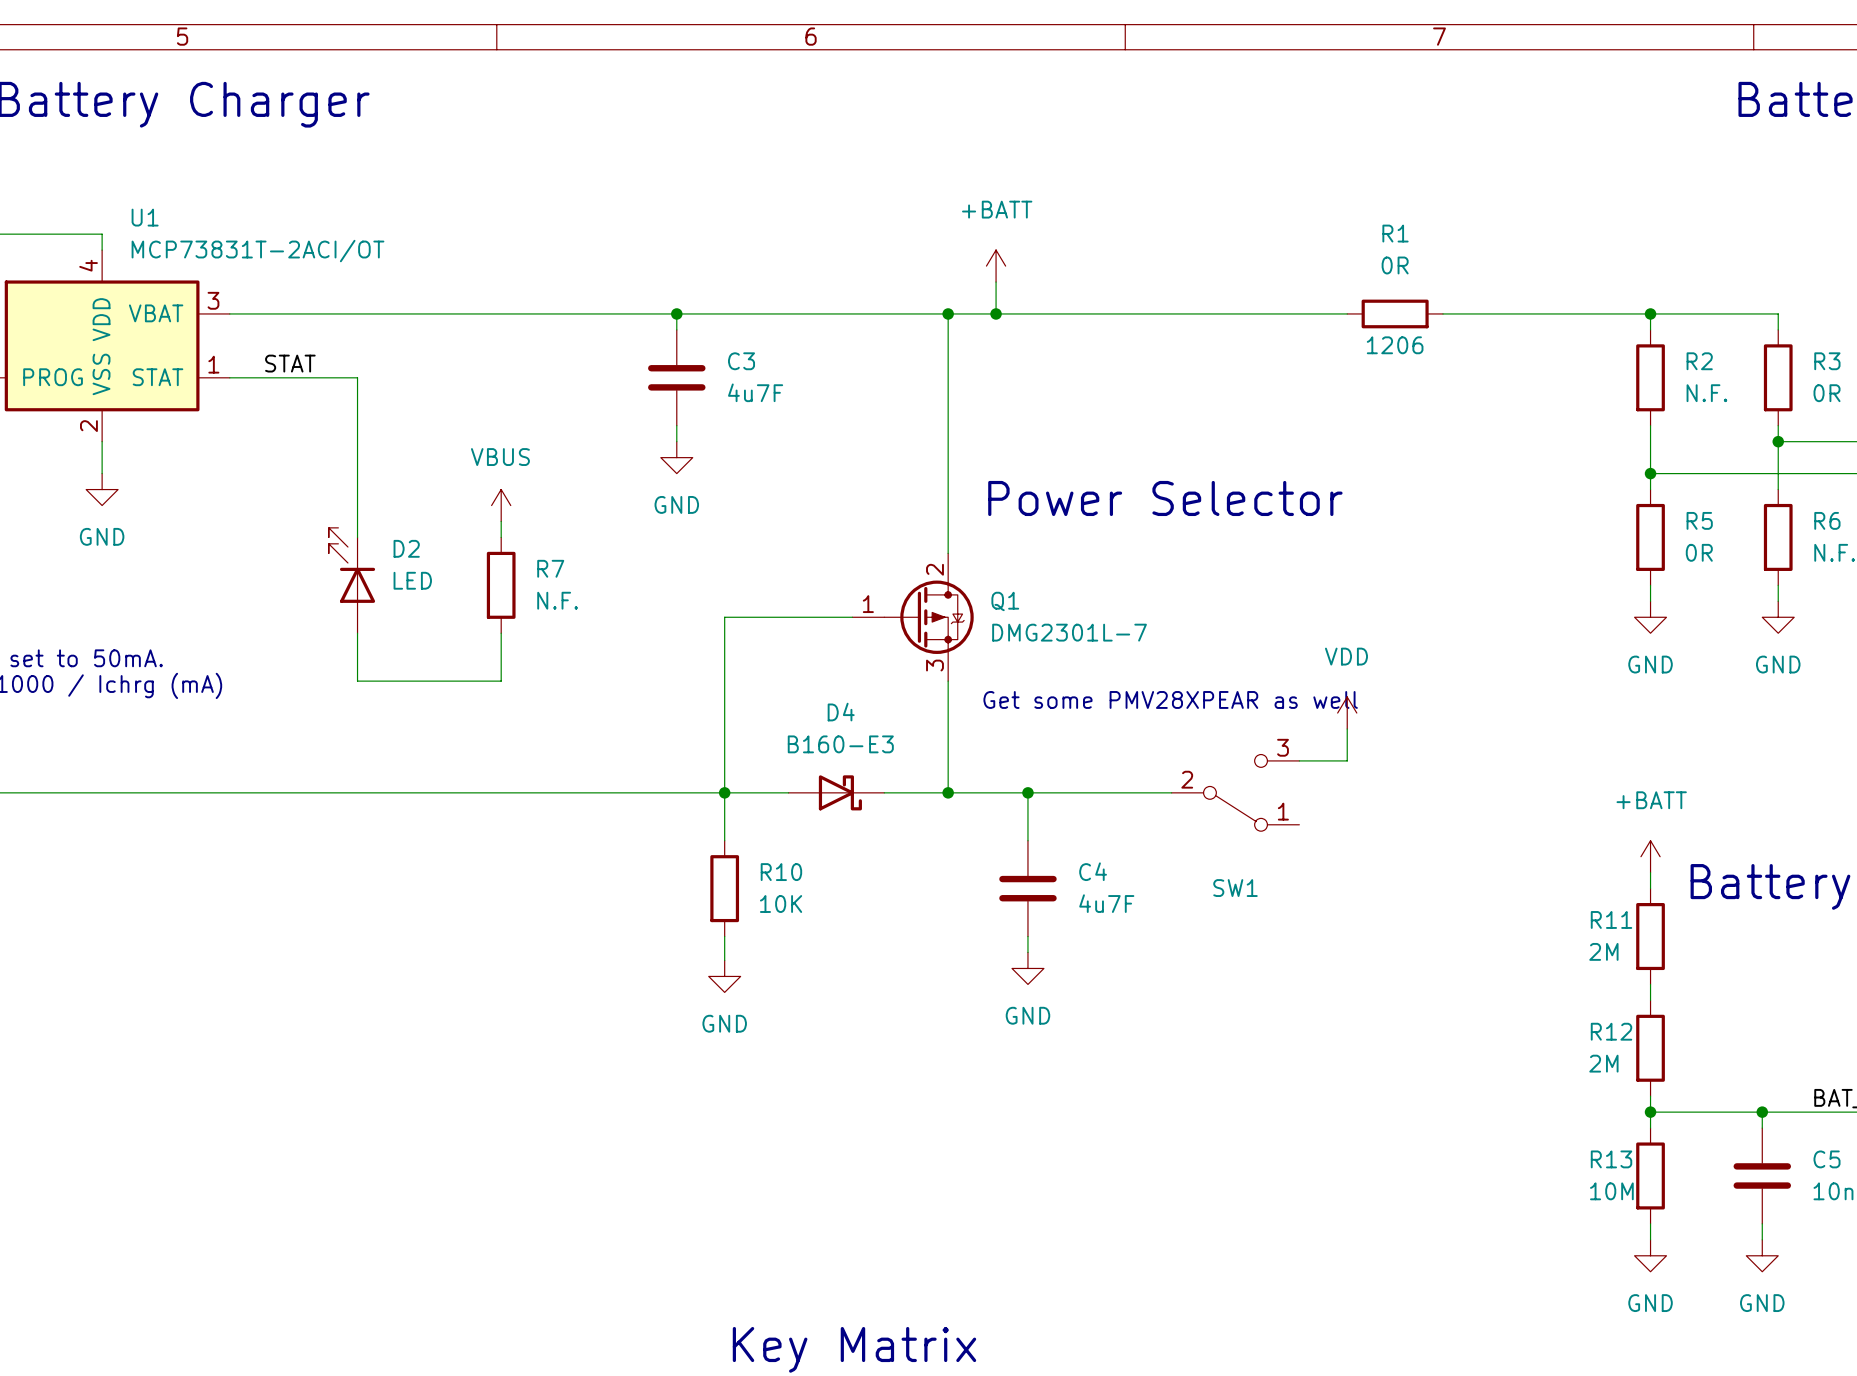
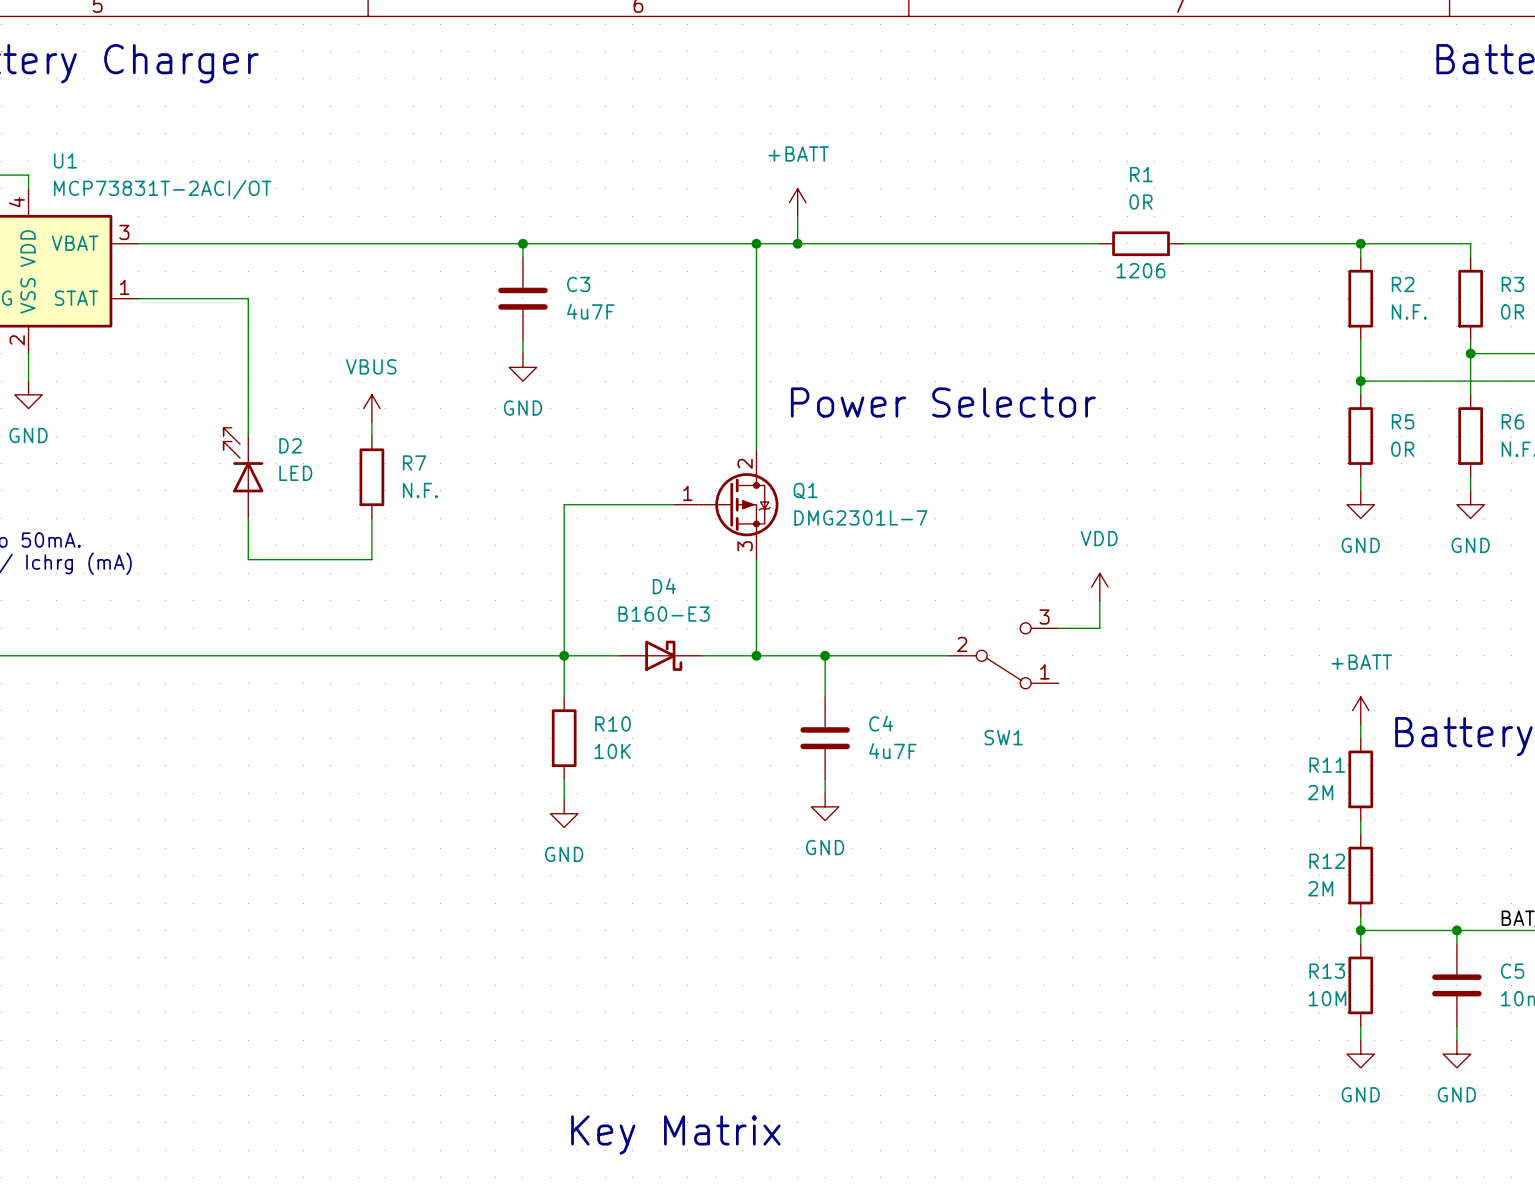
label: STAT (290, 363) -> none
text: Get some PMV28XPEAR as well (1170, 699) -> none

